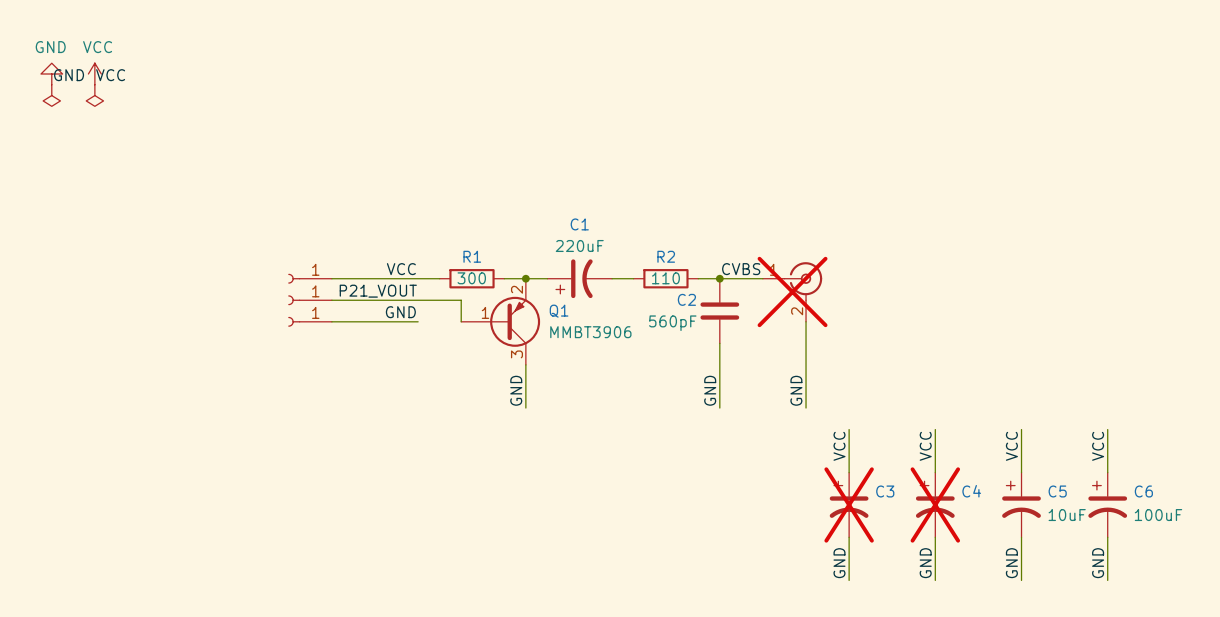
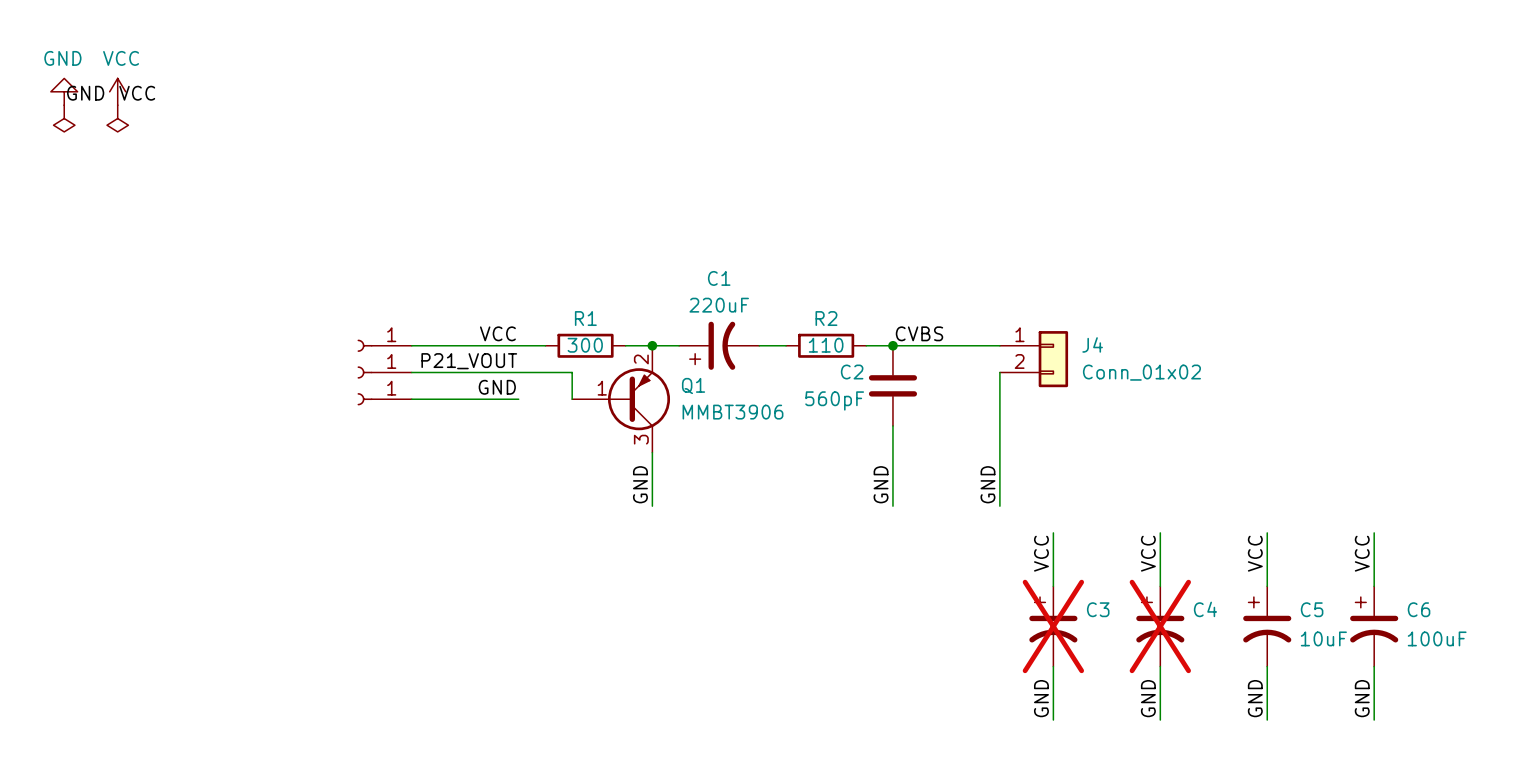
J4: none -> Conn_01x02 (1034, 359)
part: (792, 291) -> none

